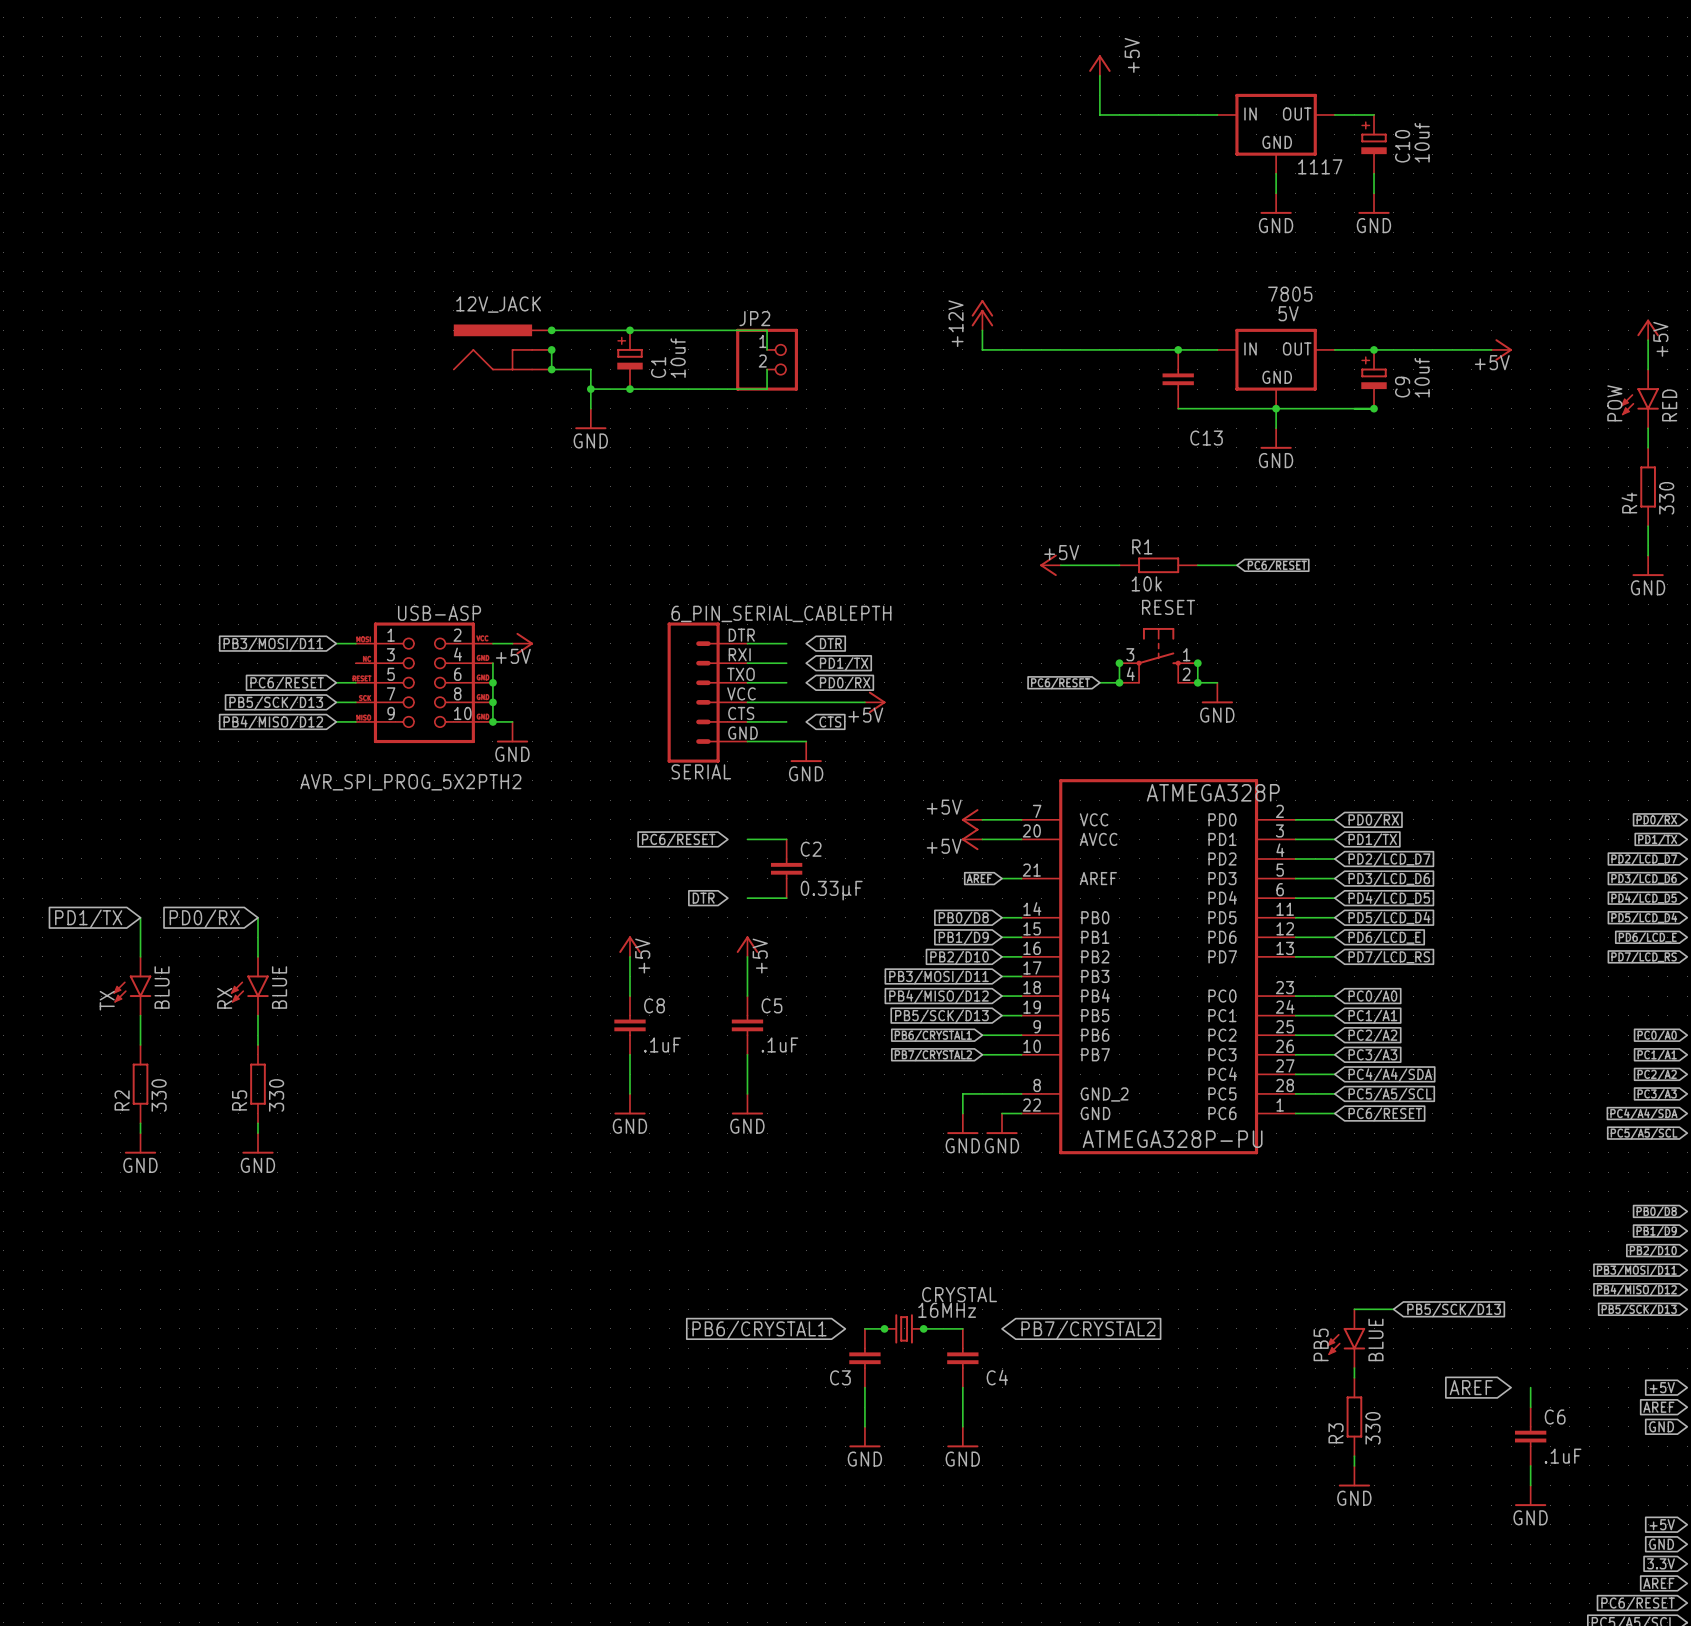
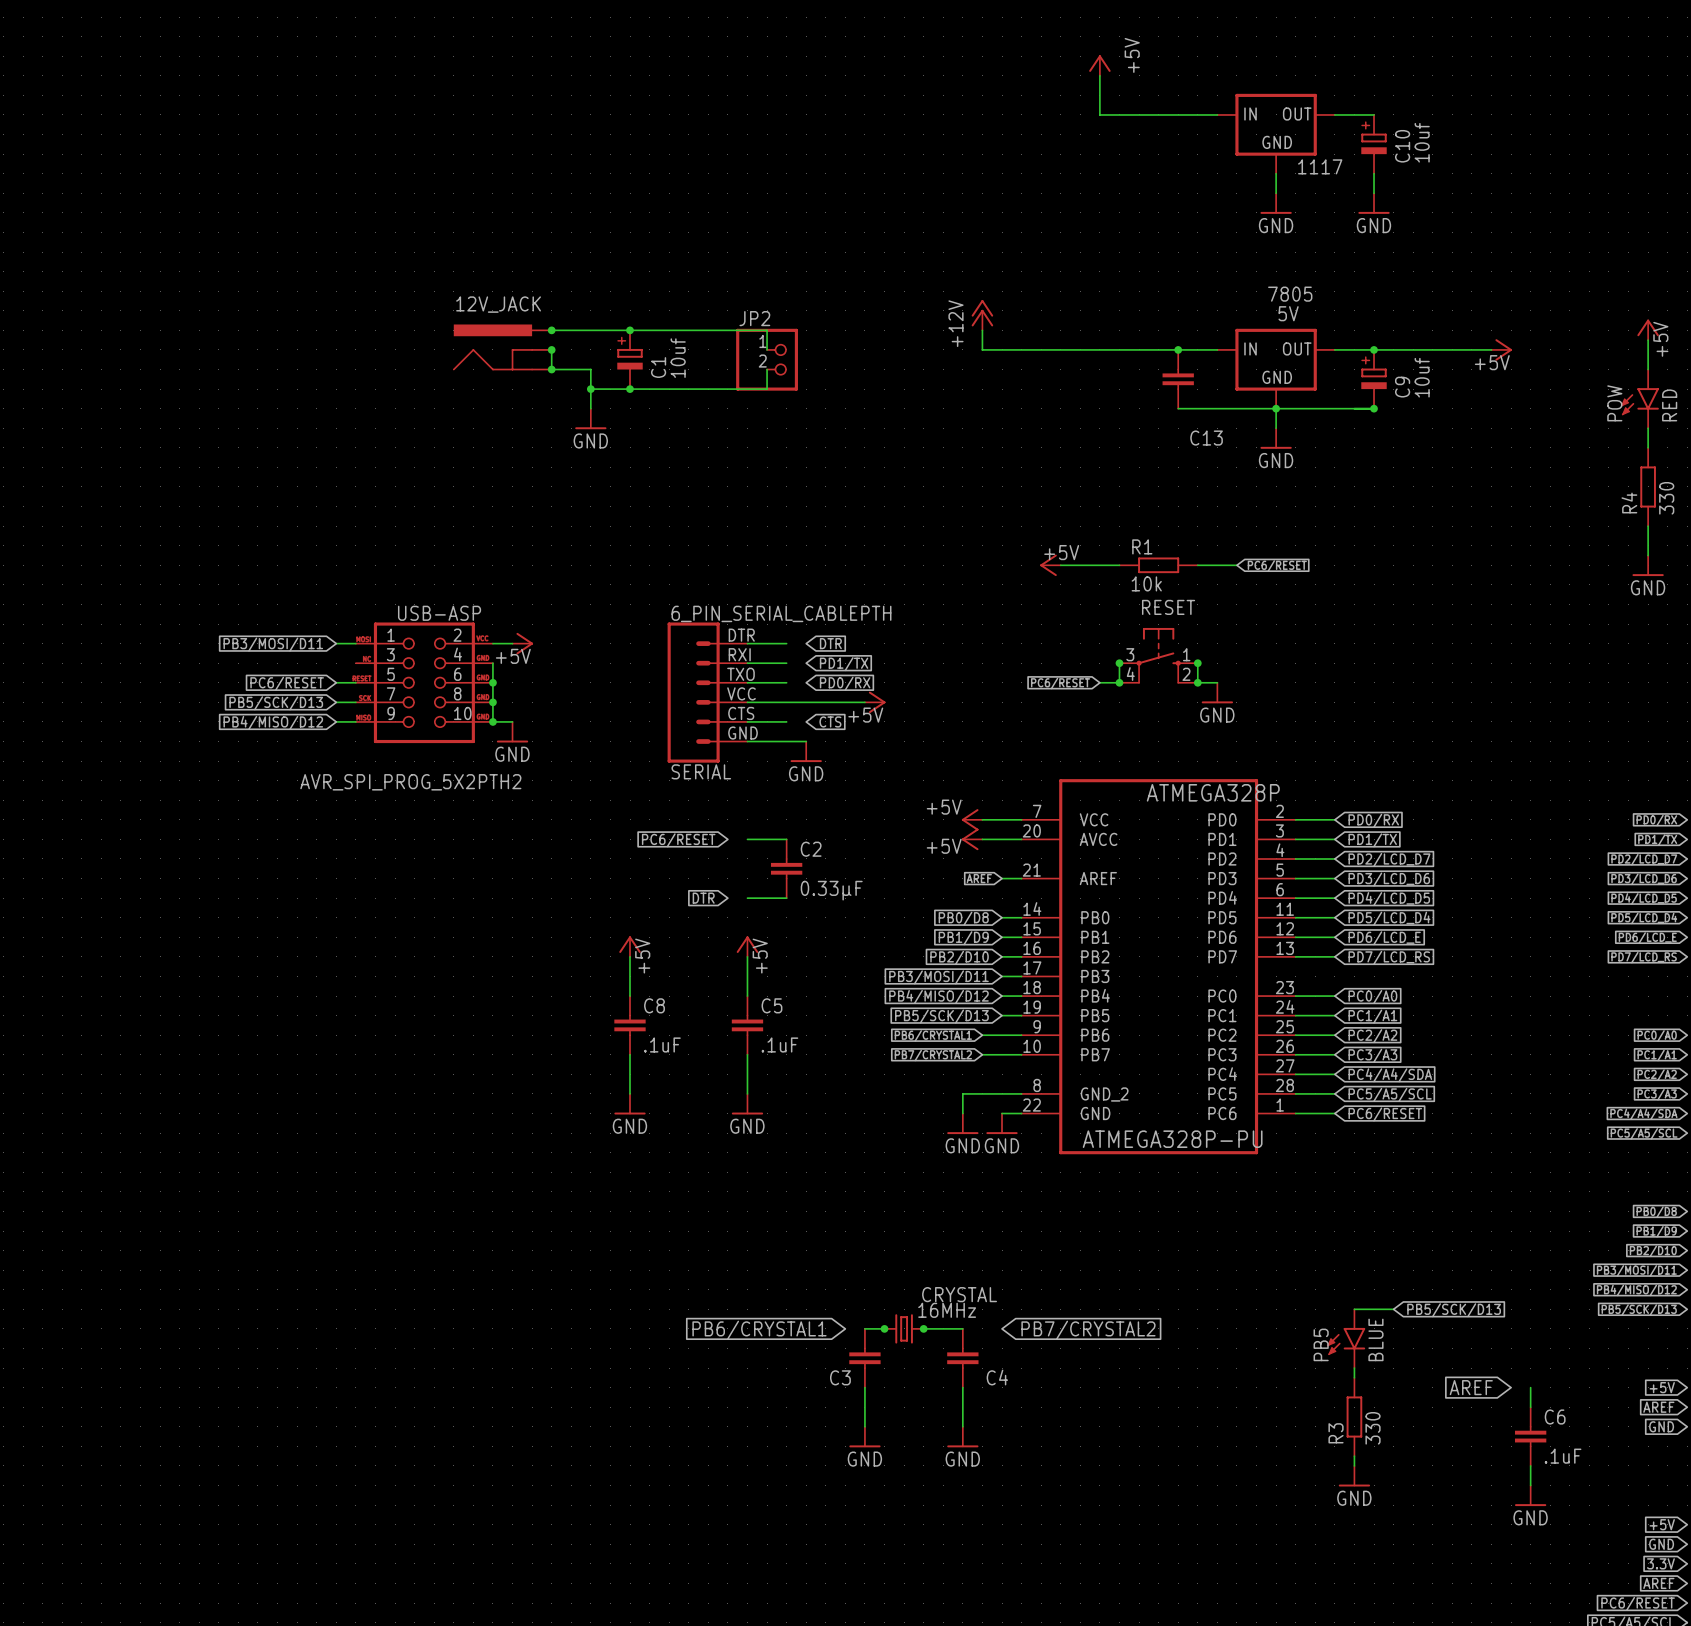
wire: (140, 917) (140, 956) -> none
wire: (257, 917) (257, 956) -> none
global label: PD1/TX (88, 919) -> none
global label: PD0/RX (204, 919) -> none
TX: BLUE (132, 986) -> none
RX: BLUE (249, 986) -> none
wire: (140, 1015) (140, 1045) -> none
wire: (257, 1015) (257, 1045) -> none
R2: 330 (140, 1084) -> none
R5: 330 (257, 1084) -> none
wire: (140, 1123) (140, 1133) -> none
wire: (257, 1123) (257, 1133) -> none
power symbol: GND (140, 1143) -> none
power symbol: GND (257, 1143) -> none

